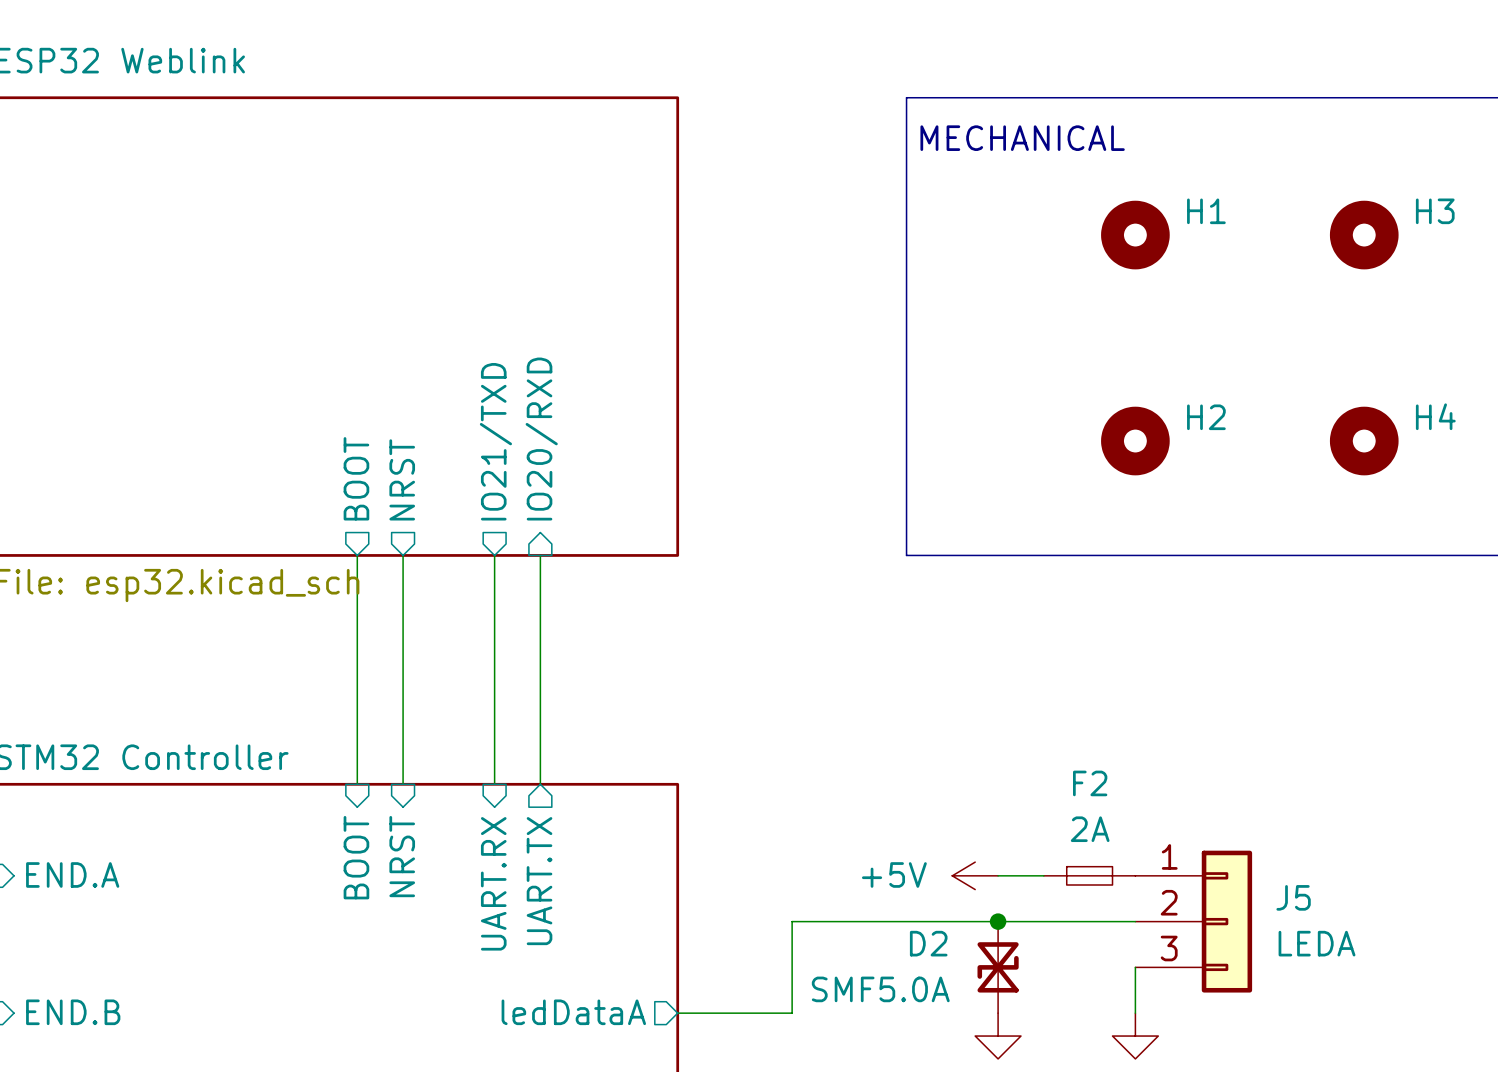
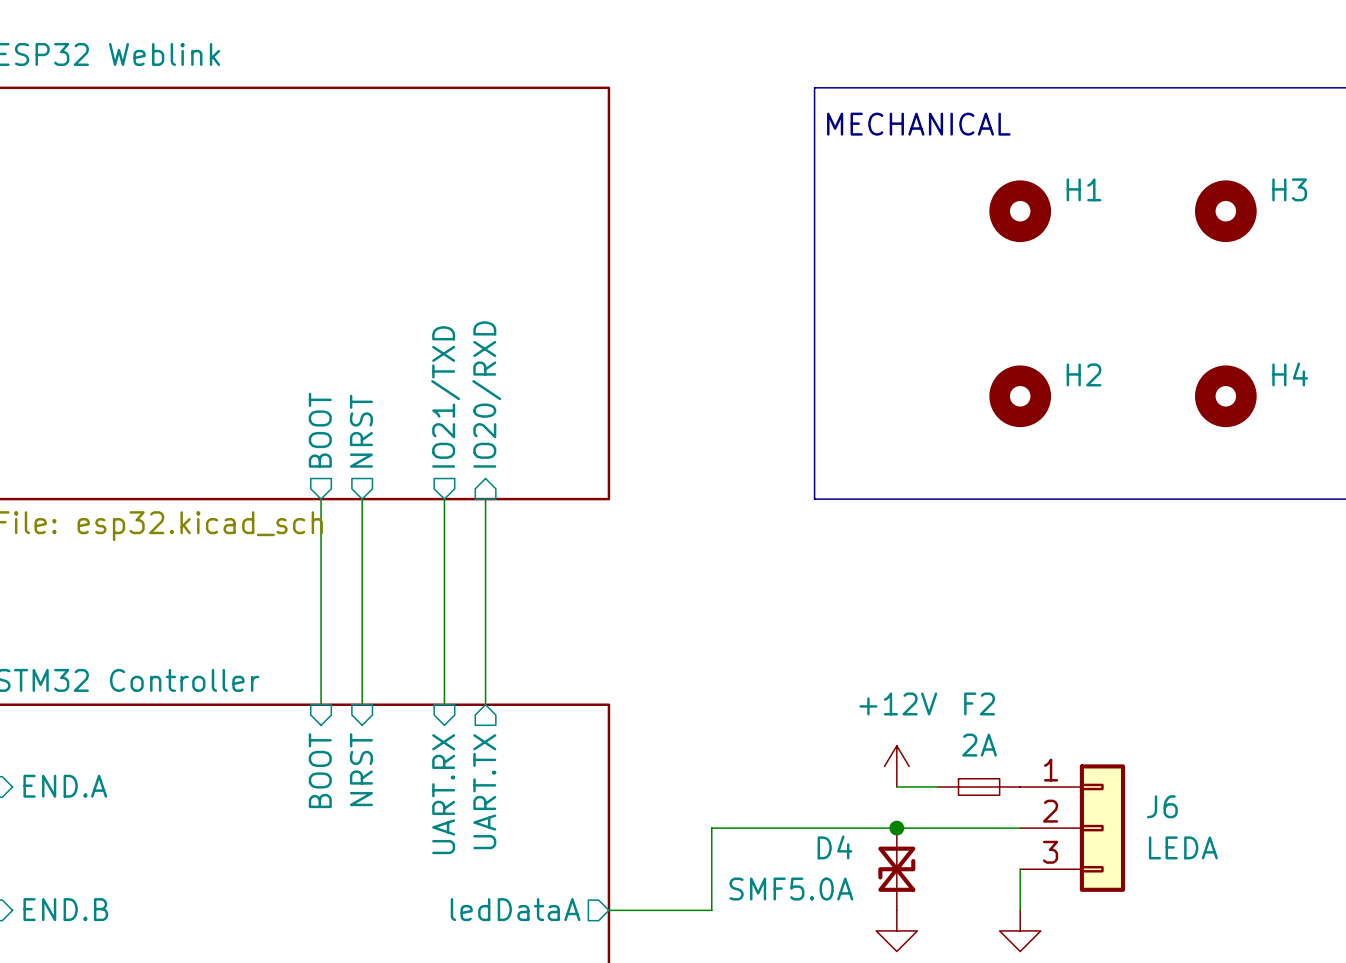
power symbol: none -> +12V (896, 766)
power symbol: +5V (975, 875) -> none
J5 name: J5 (1293, 897) -> J6 (1162, 806)
D2 name: D2 (928, 943) -> D4 (834, 847)

